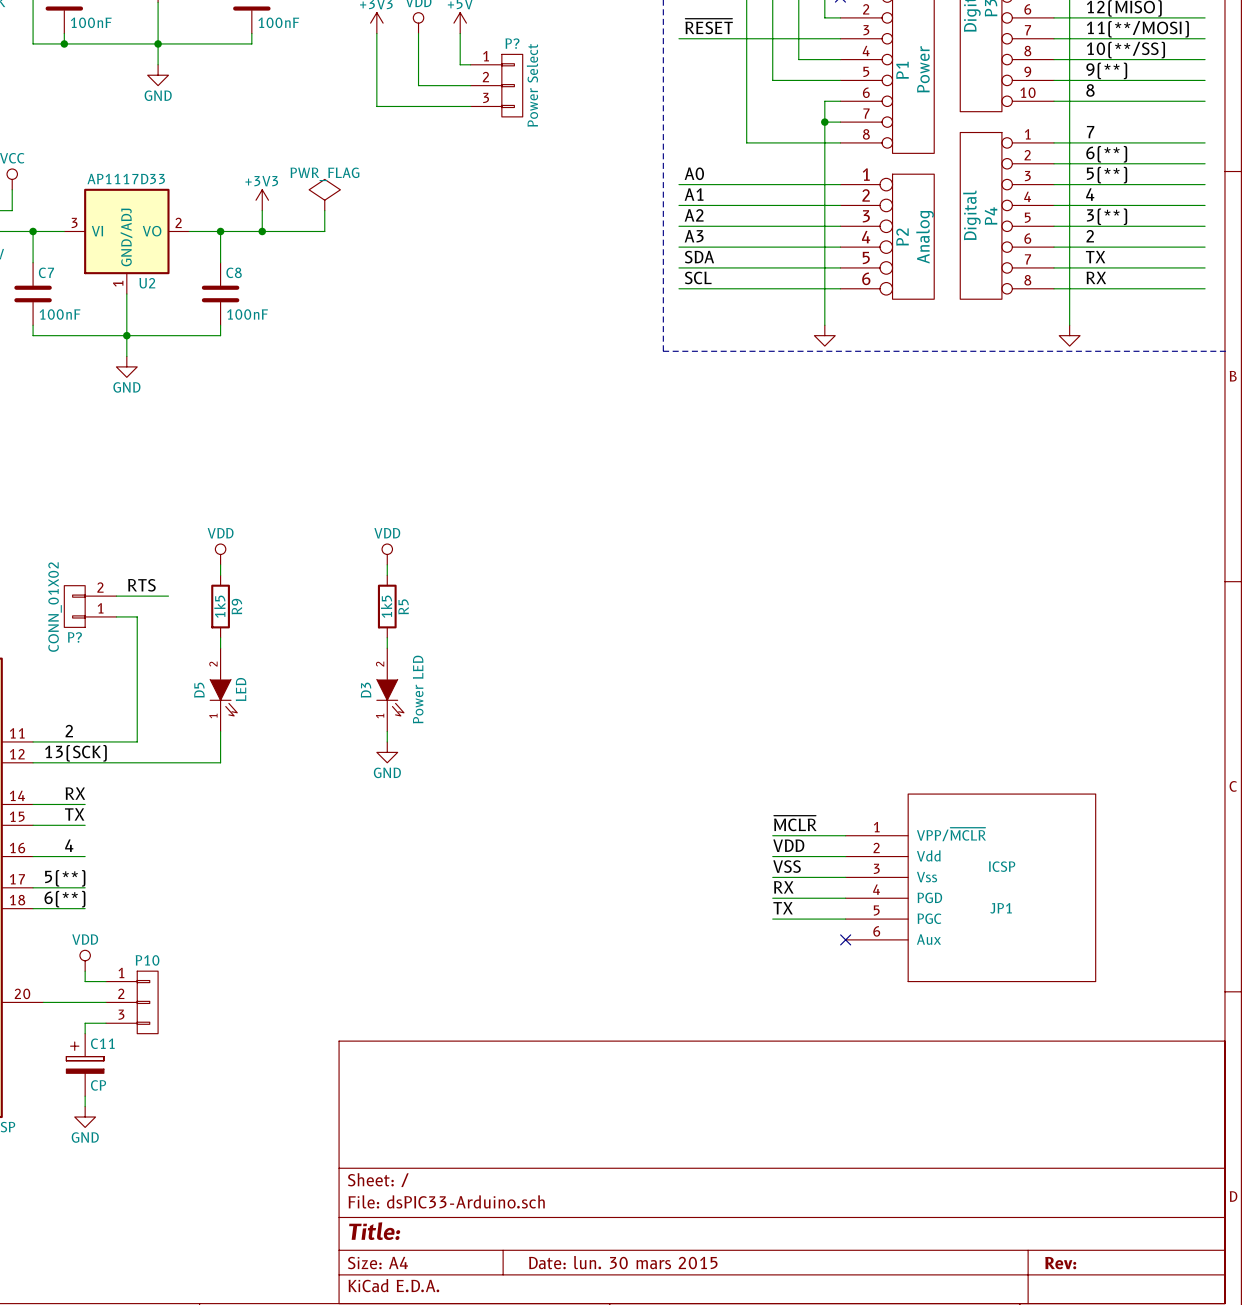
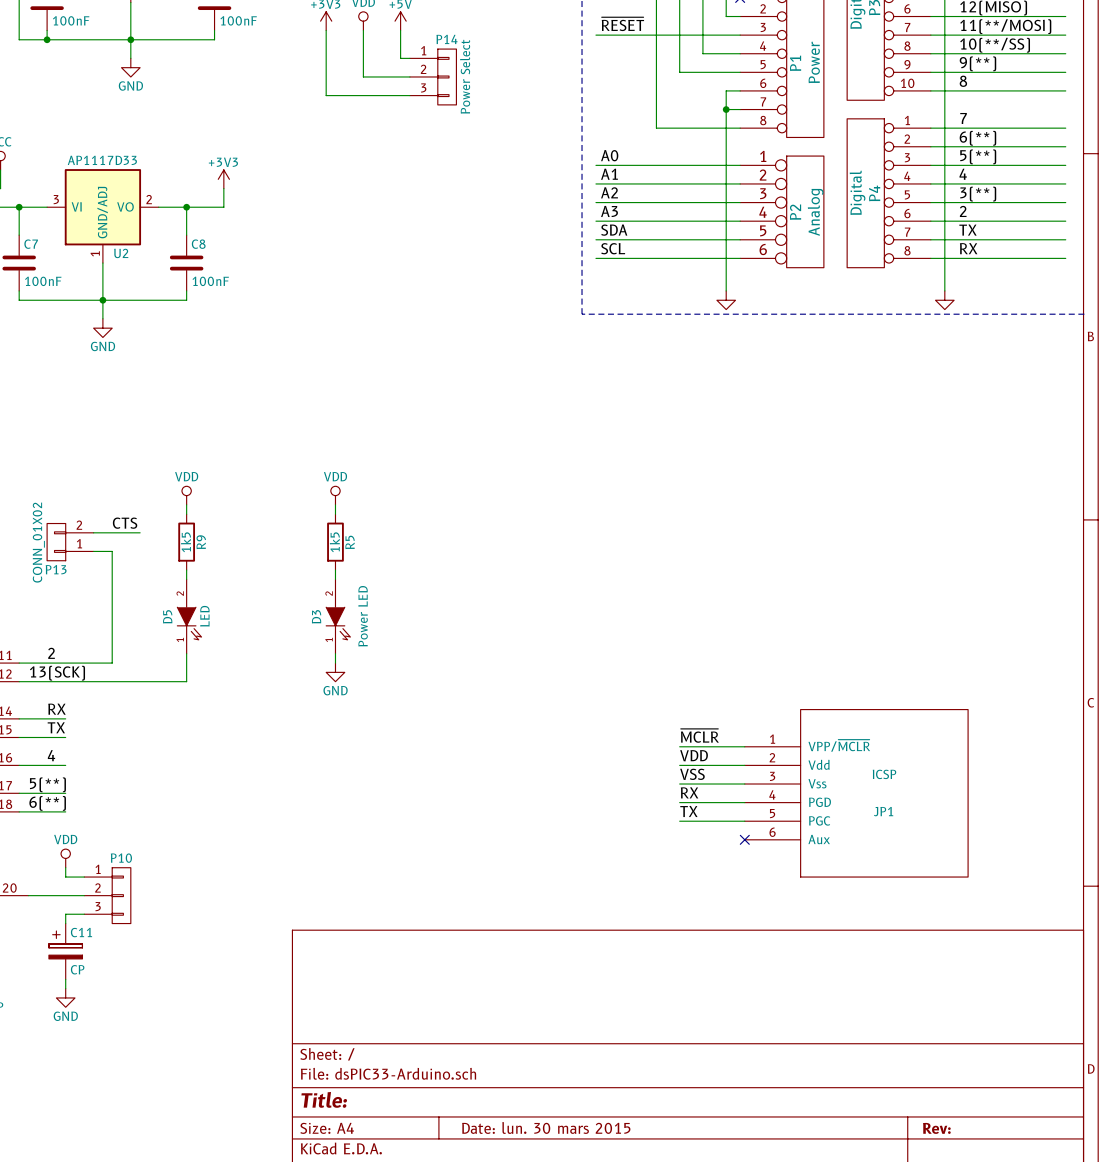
P? name: P? (512, 43) -> P14 (446, 39)
power symbol: PWR_FLAG (324, 195) -> none
wire: (324, 210) (324, 231) (262, 231) -> none
junction: (262, 231) -> none
label: RTS (141, 585) -> CTS (125, 523)
P? name: P? (74, 637) -> P13 (56, 569)

